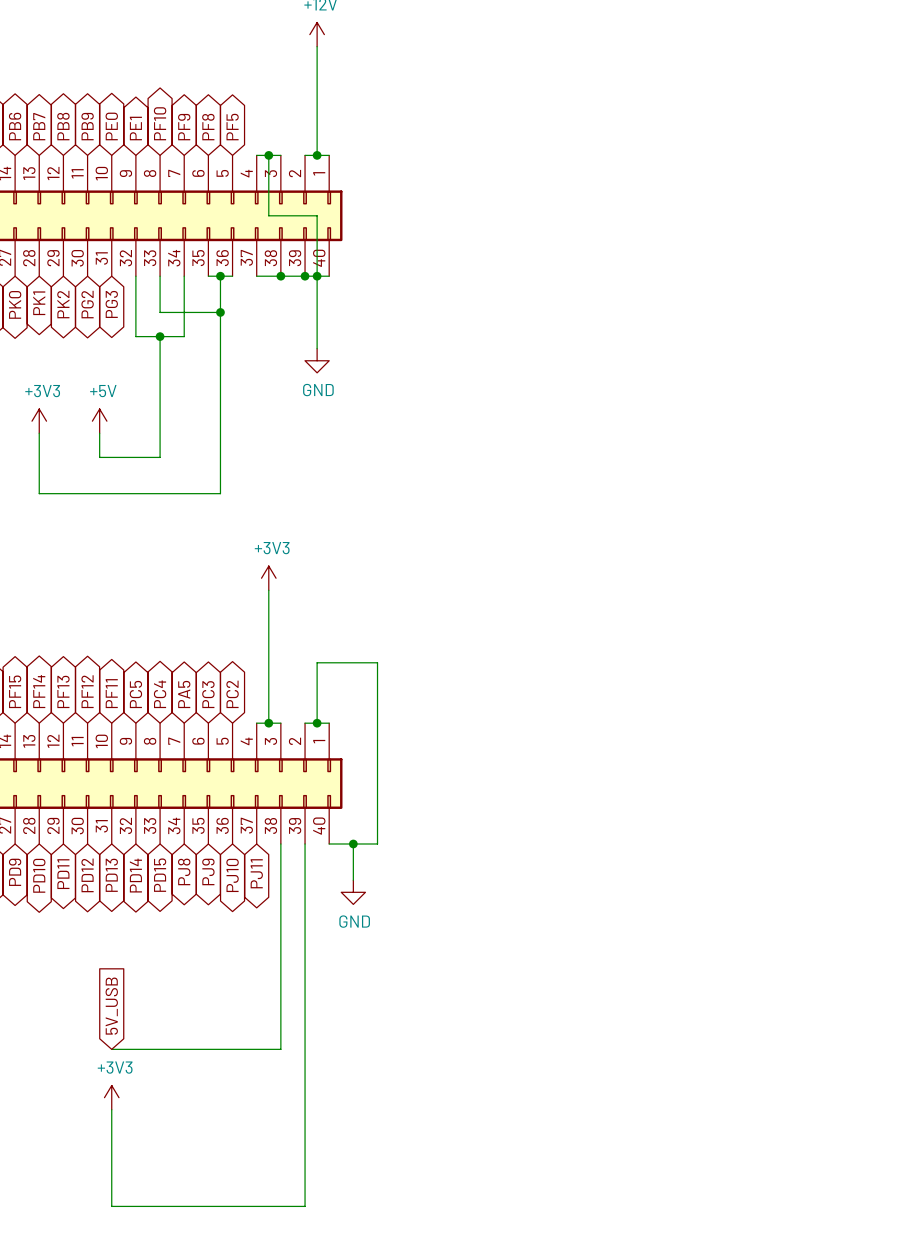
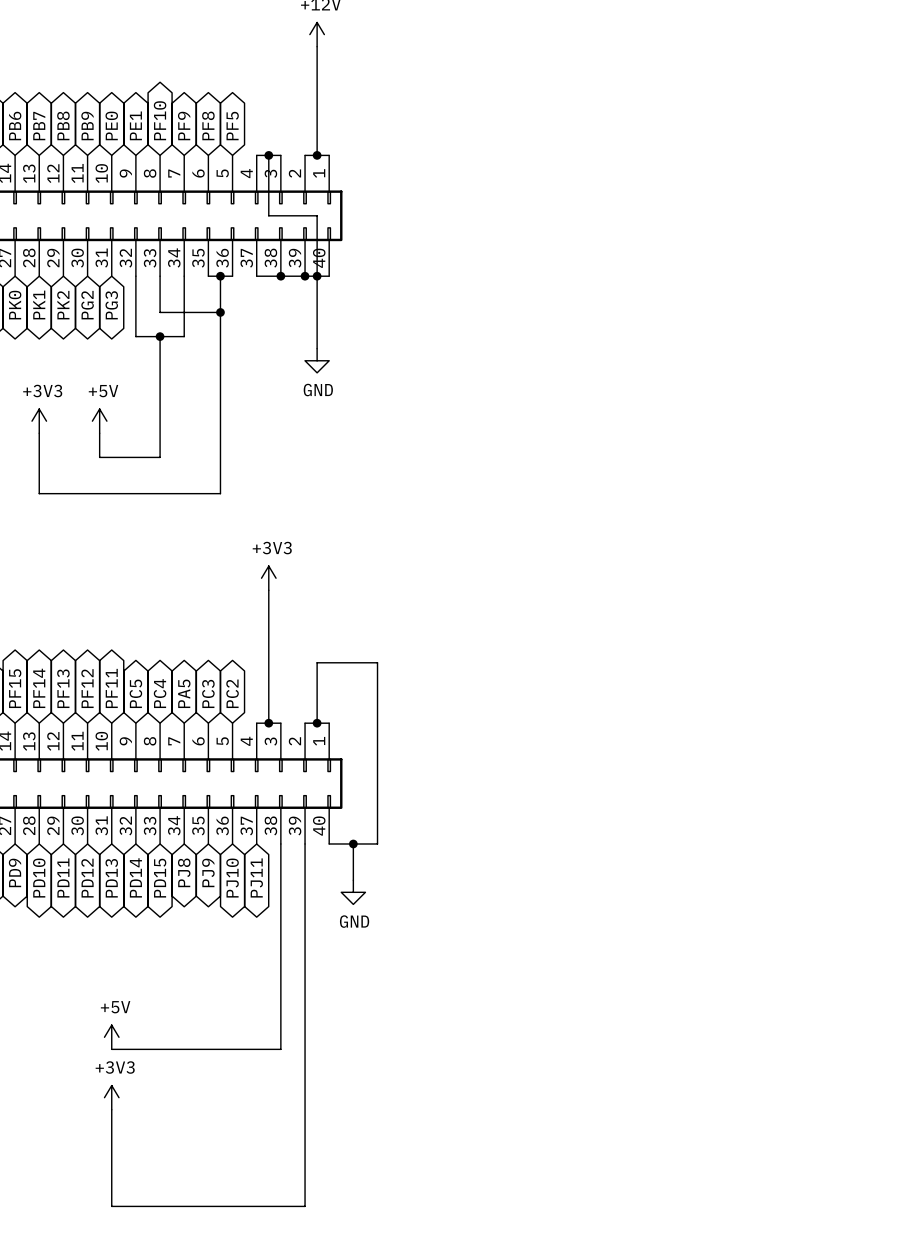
global label: 5V_USB (111, 1006) -> none
power symbol: none -> +5V (111, 1037)

